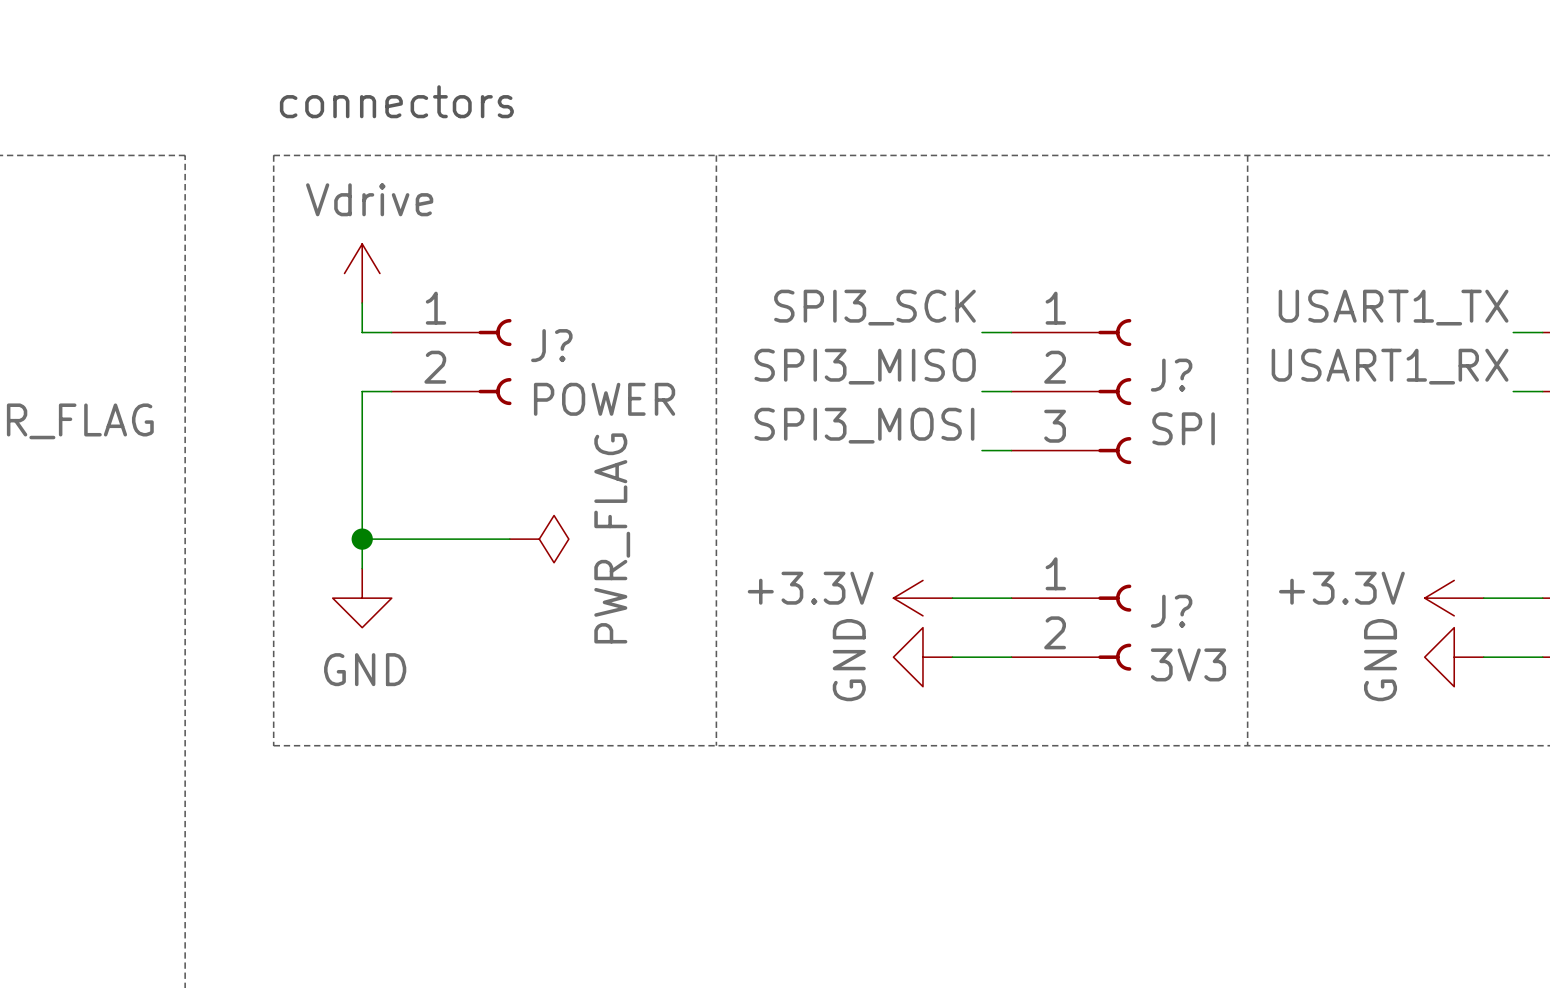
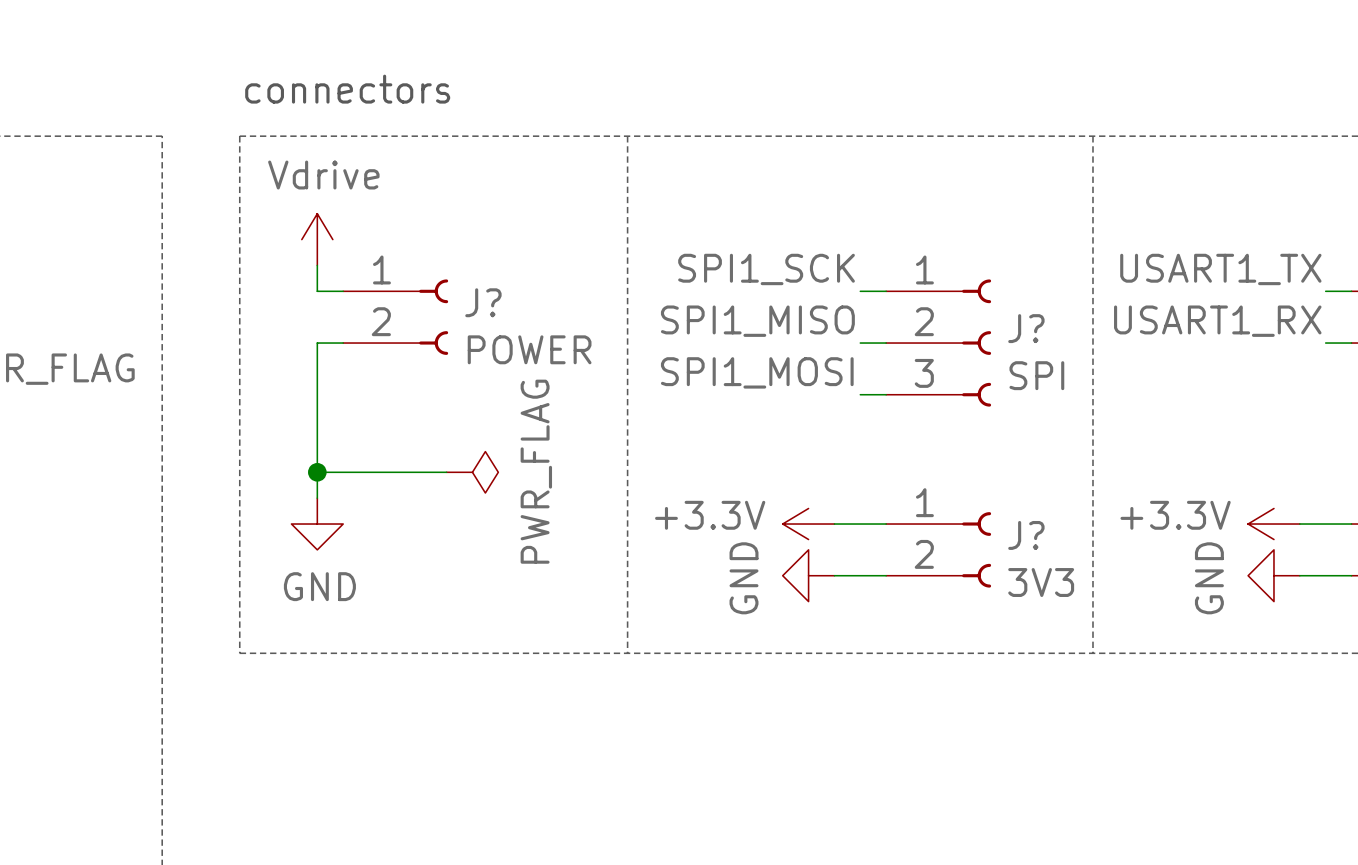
label: SPI3_SCK (874, 307) -> SPI1_SCK (766, 269)
label: SPI3_MISO (865, 366) -> SPI1_MISO (757, 321)
label: SPI3_MOSI (864, 425) -> SPI1_MOSI (757, 372)

